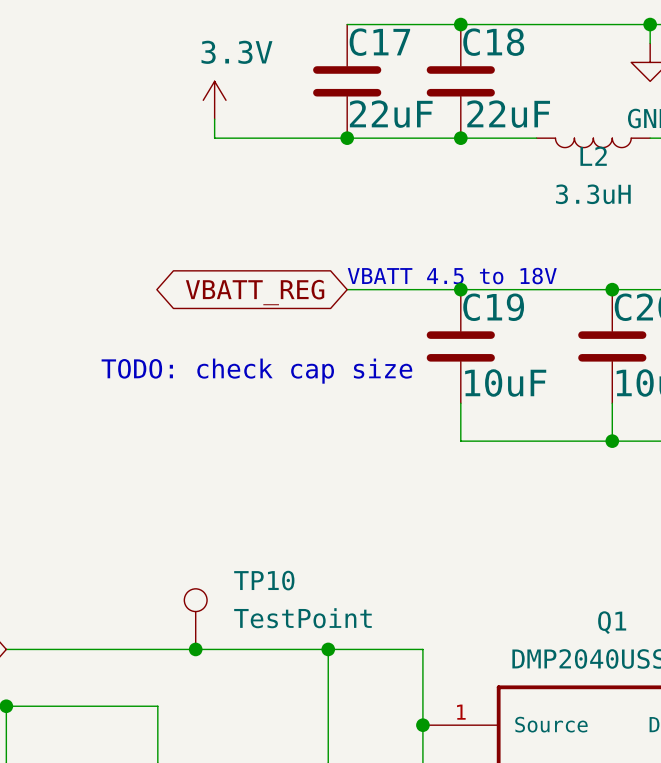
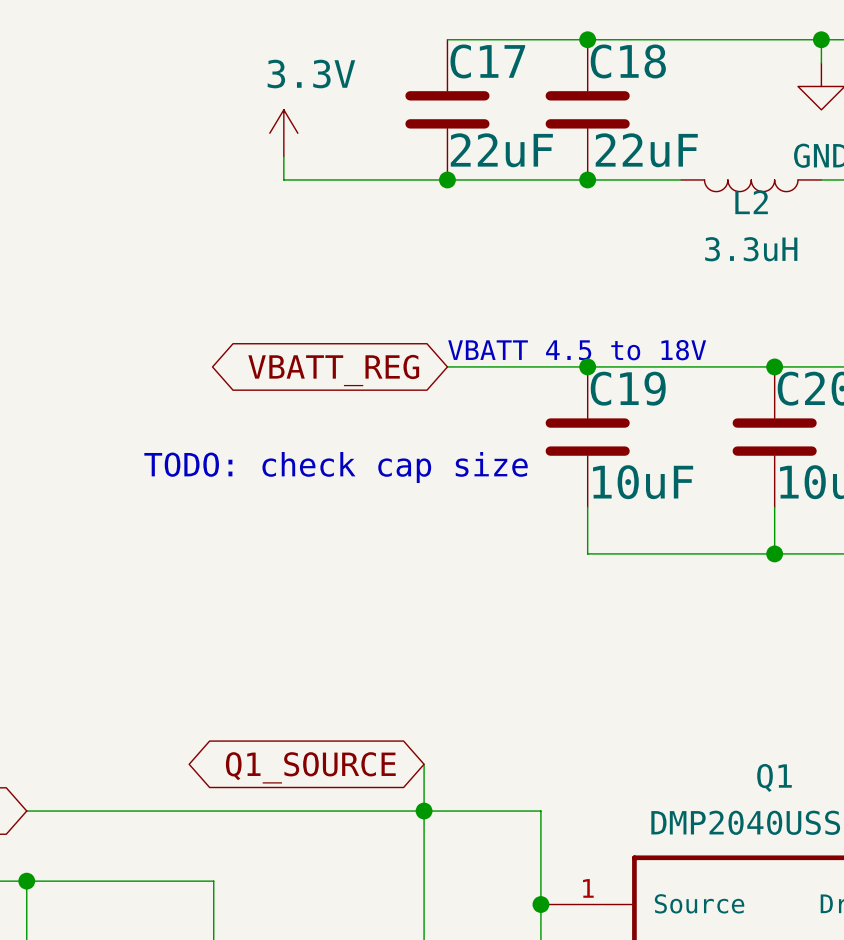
wire: none -> (424, 764) (424, 811)
global label: none -> Q1_SOURCE (310, 767)
TP10: TestPoint (195, 619) -> none
junction: (195, 649) -> none

